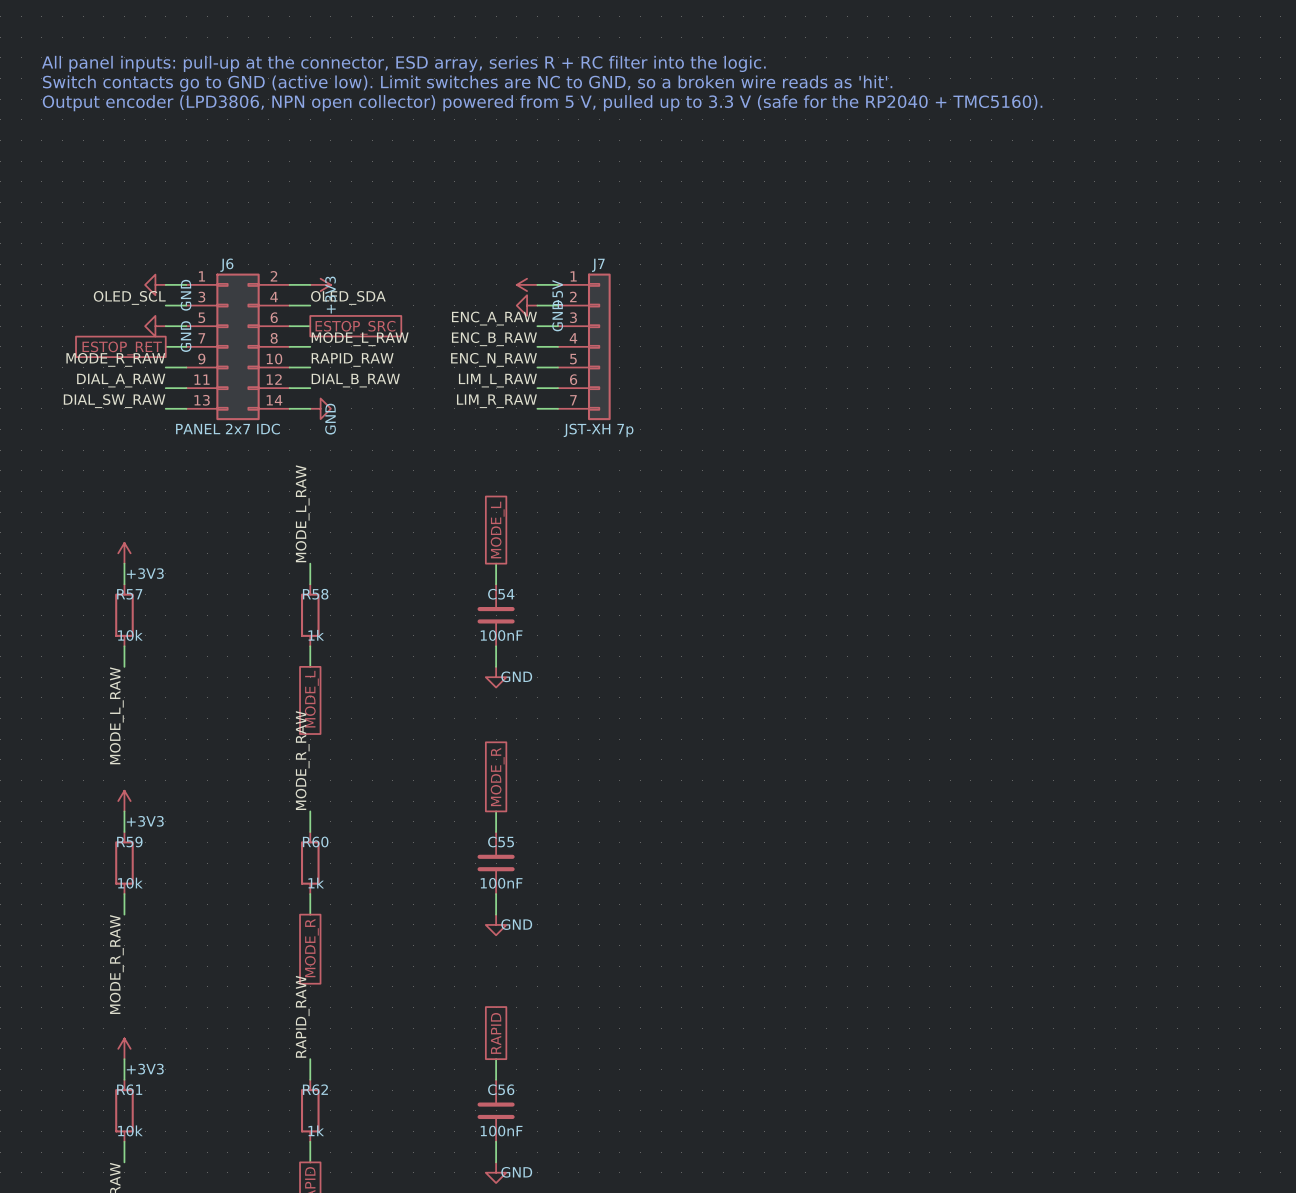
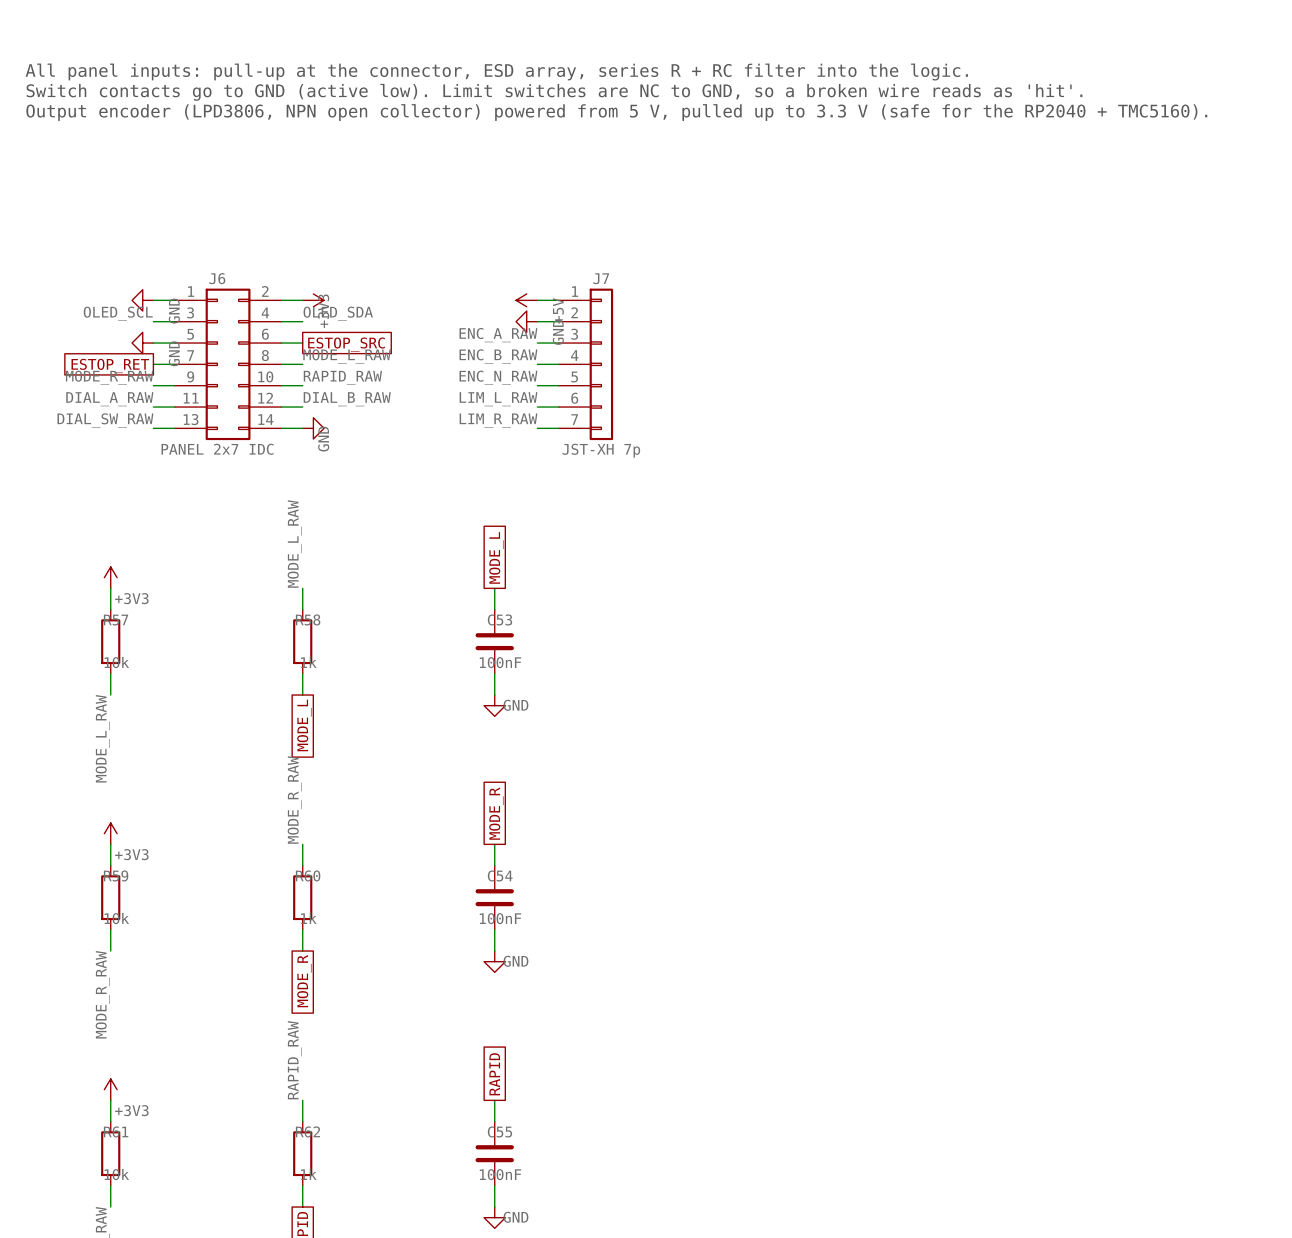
C54 name: C54 (501, 594) -> C53 (500, 619)
C55 name: C55 (501, 841) -> C54 (500, 875)
C56 name: C56 (501, 1089) -> C55 (499, 1131)

